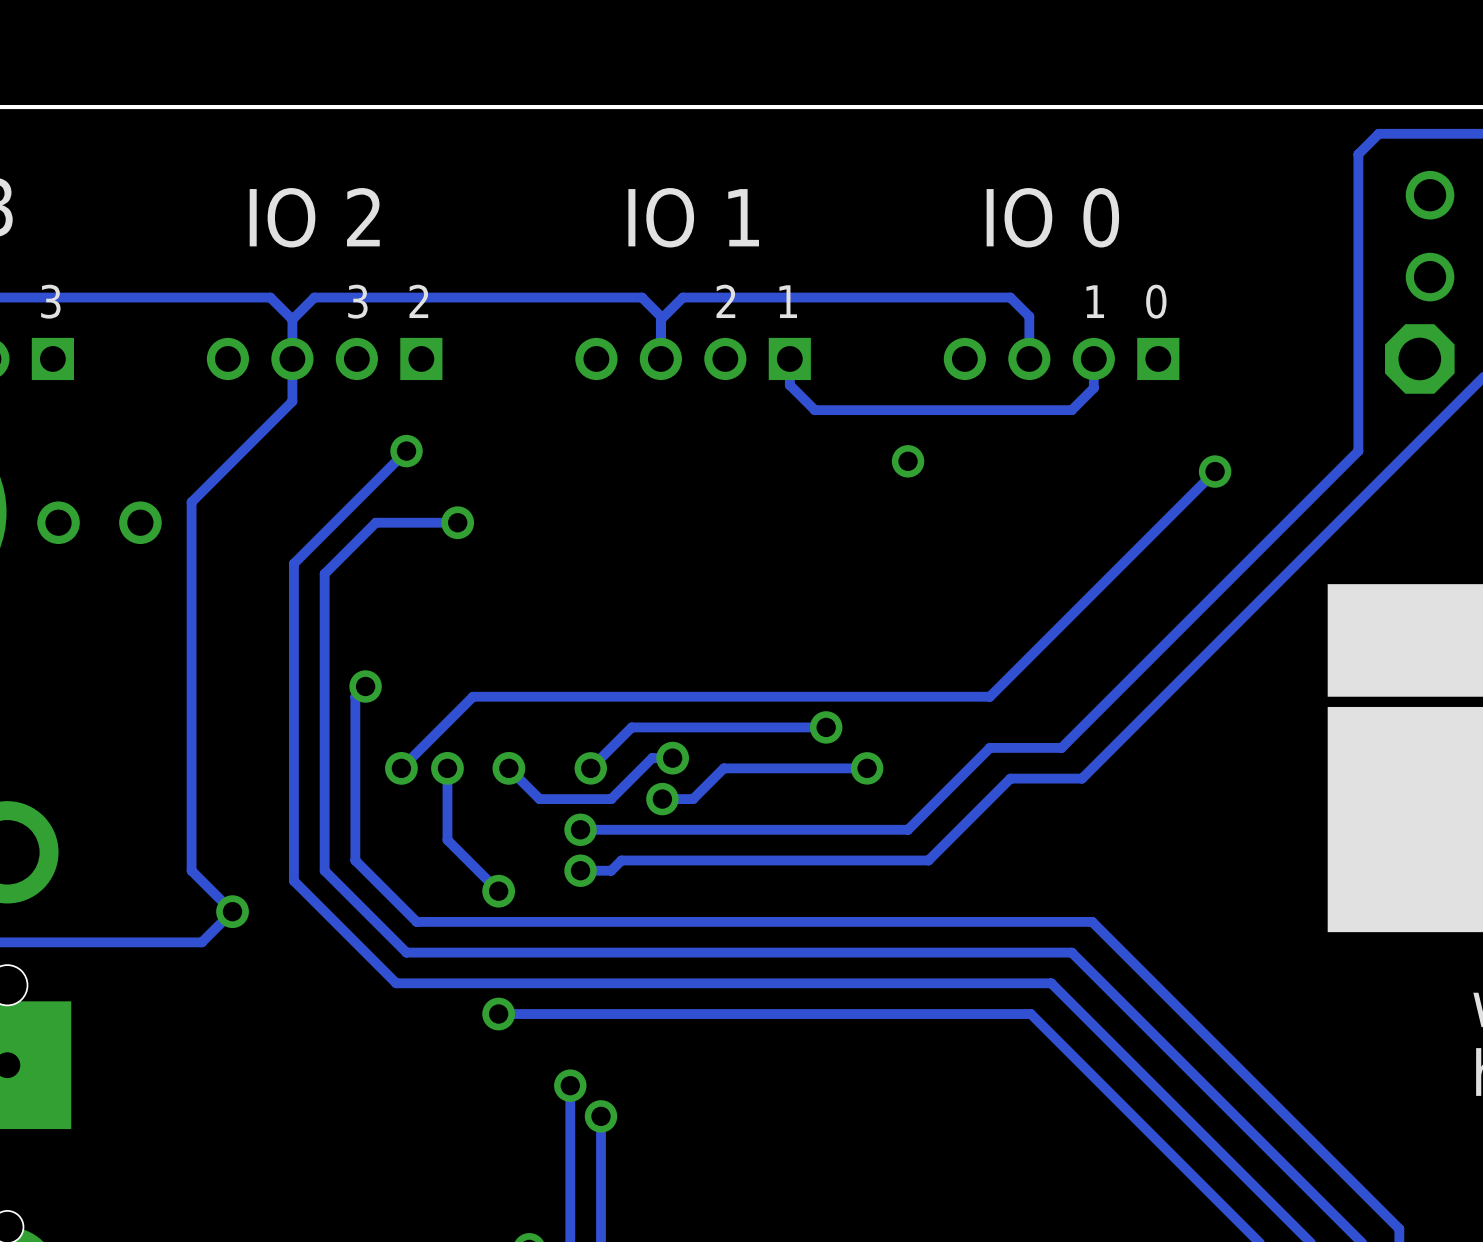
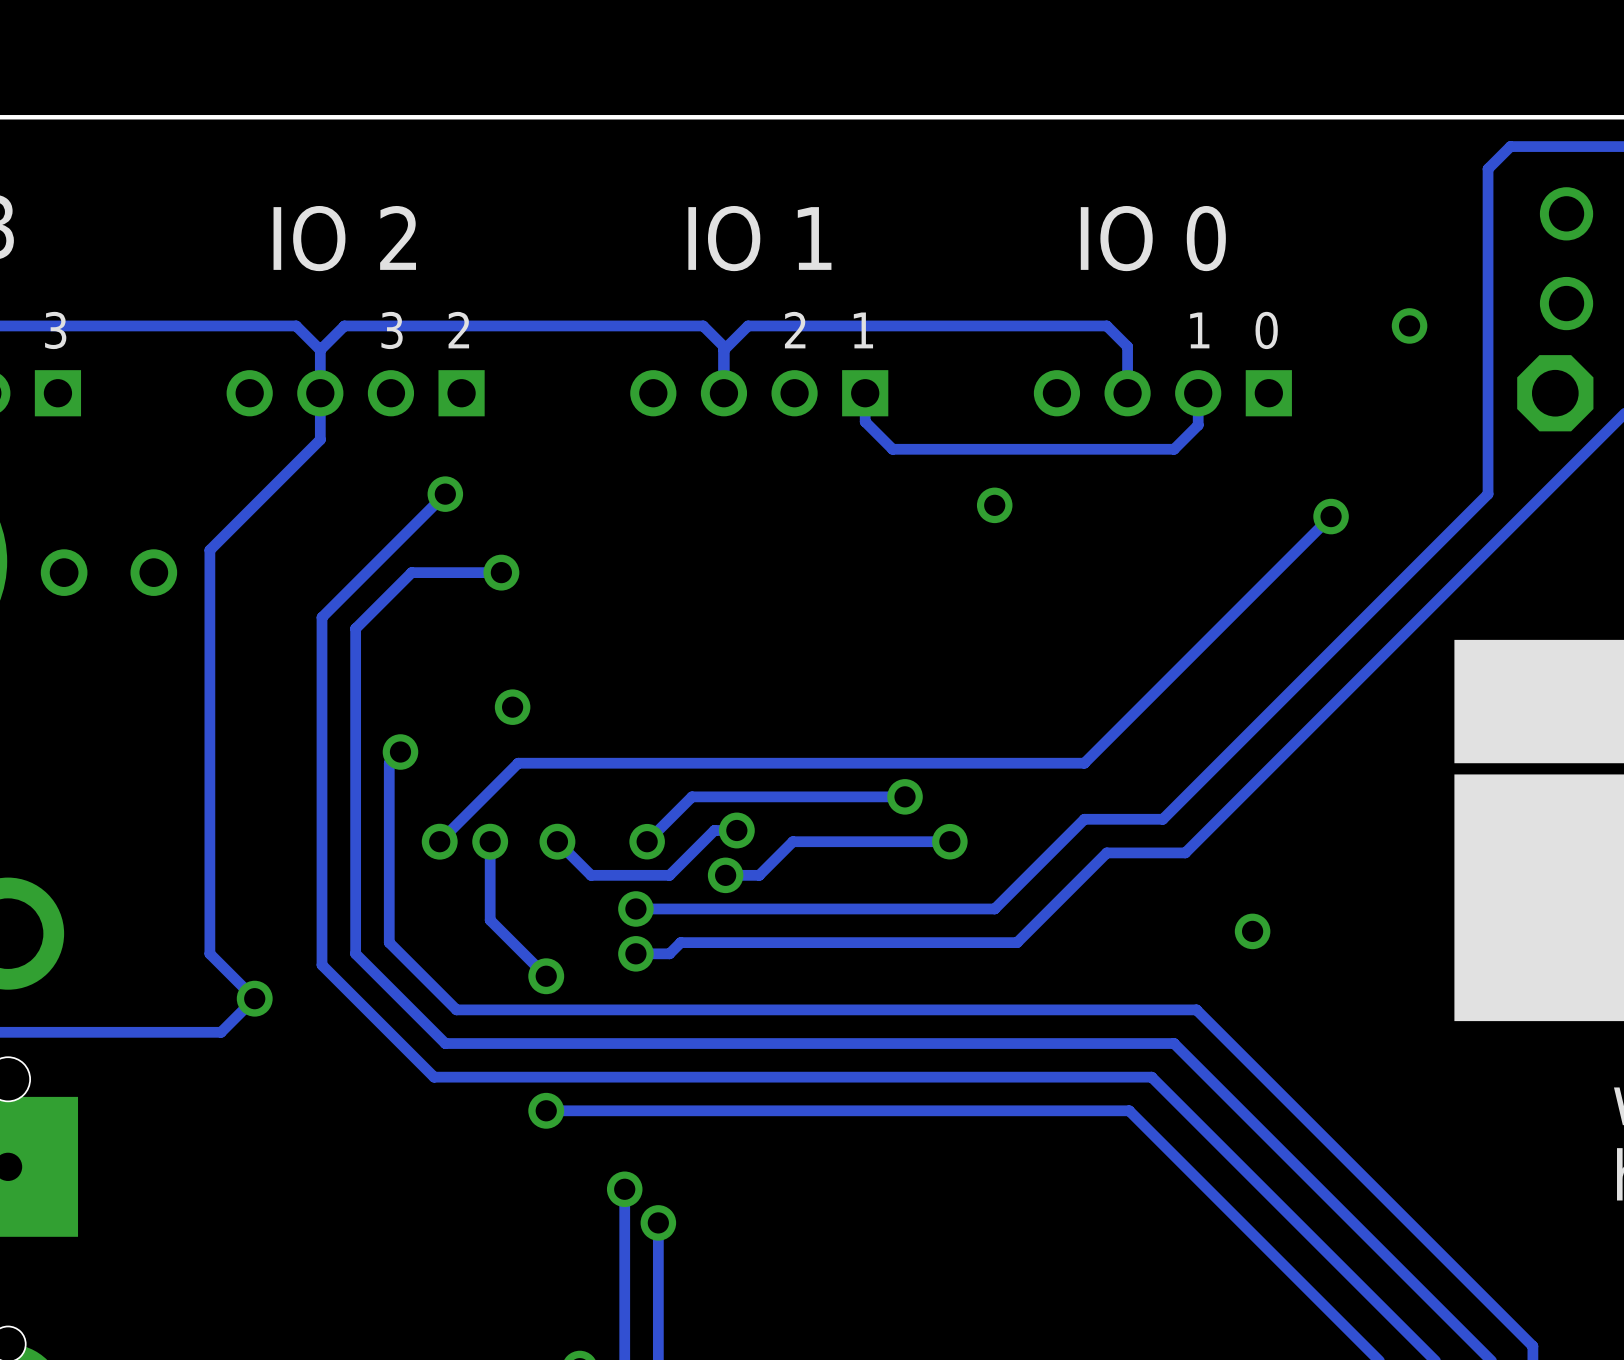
via: none -> (1409, 325)
via: none -> (512, 707)
via: none -> (1252, 931)

